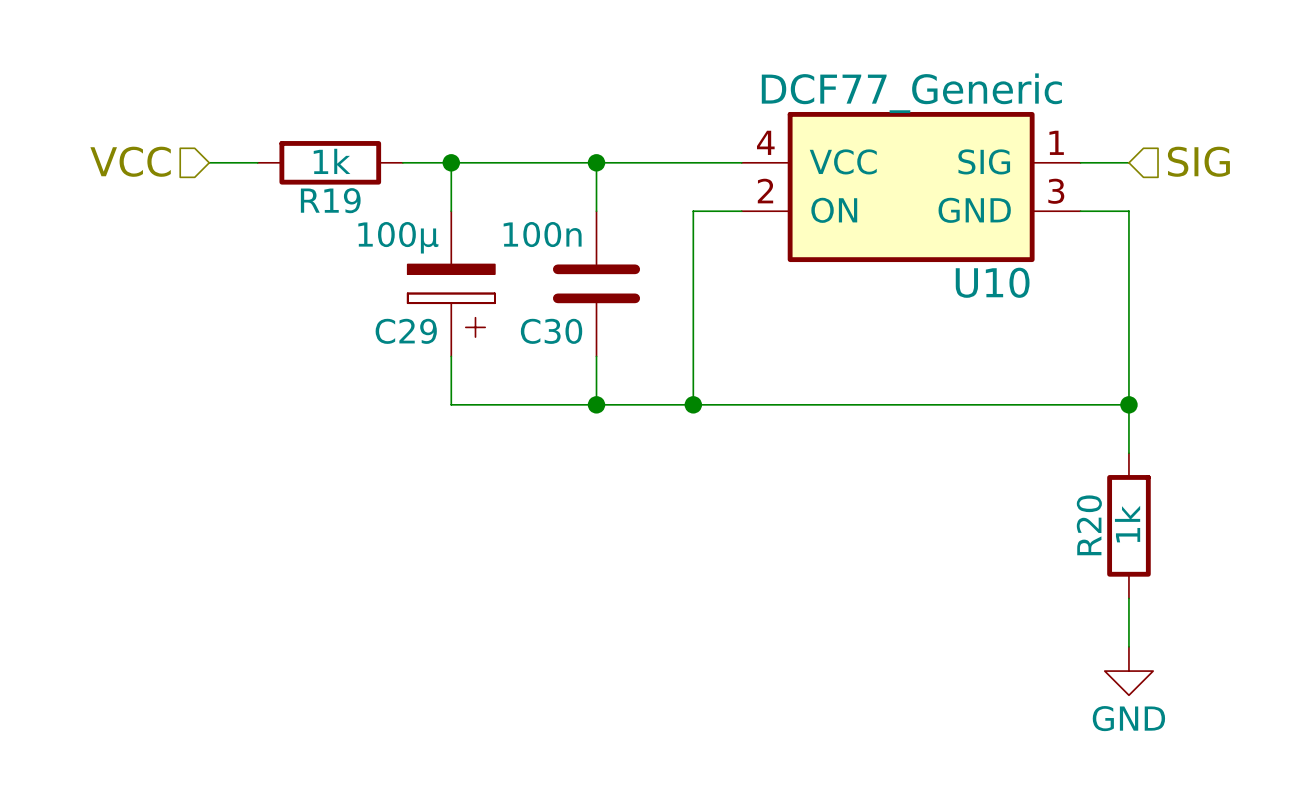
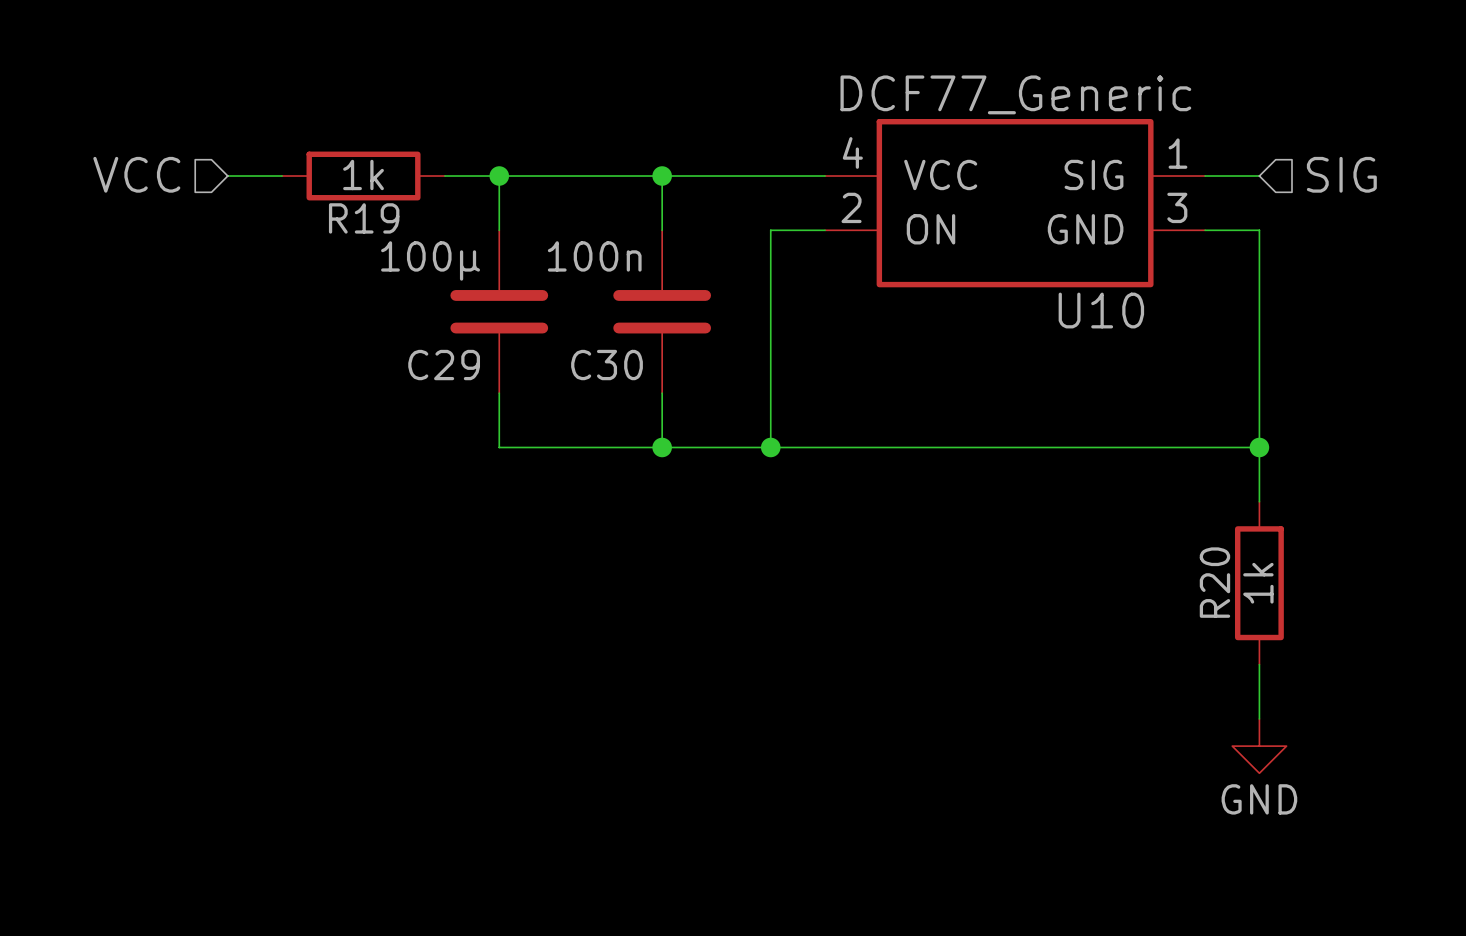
C29 symbol: [407, 211, 495, 357] -> [450, 230, 549, 394]

